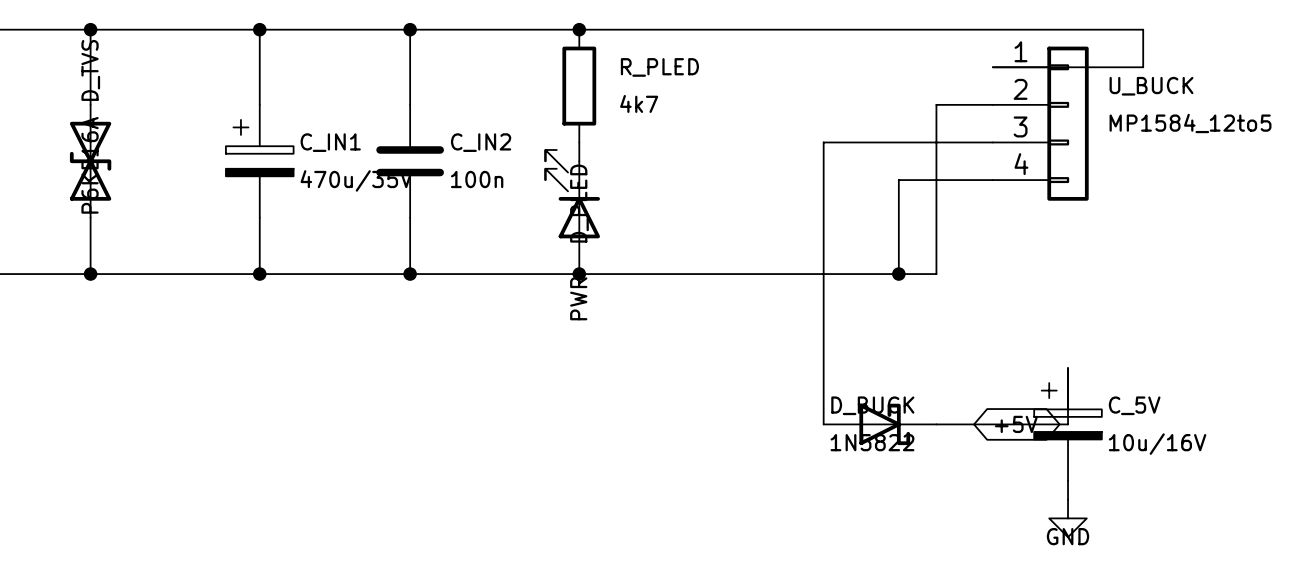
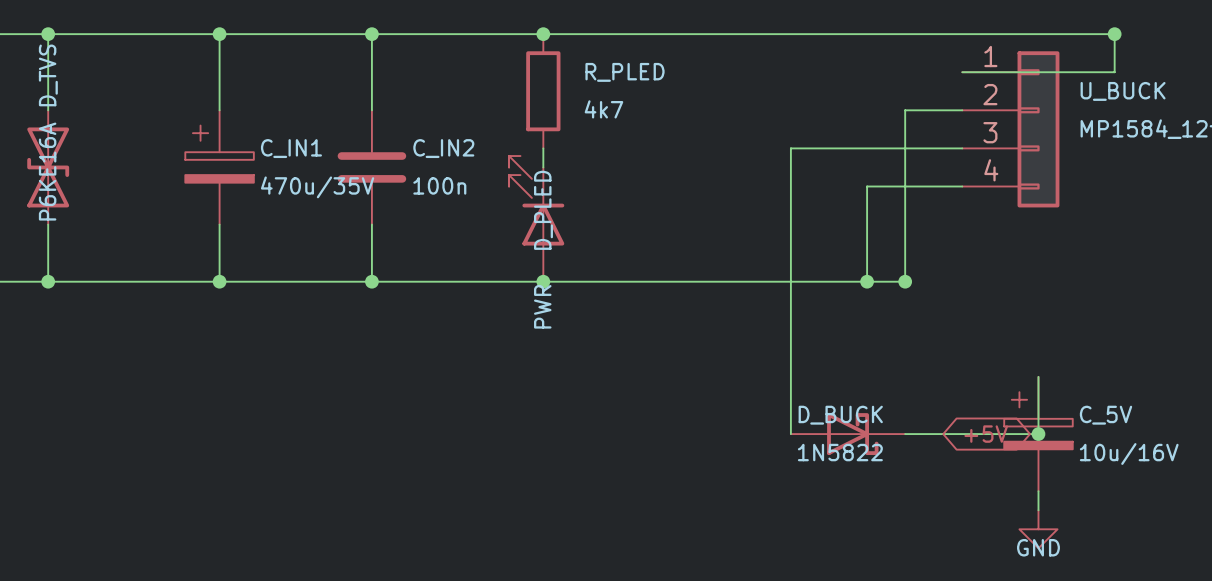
junction: none -> (1114, 34)
junction: none -> (905, 281)
junction: none -> (1038, 434)

